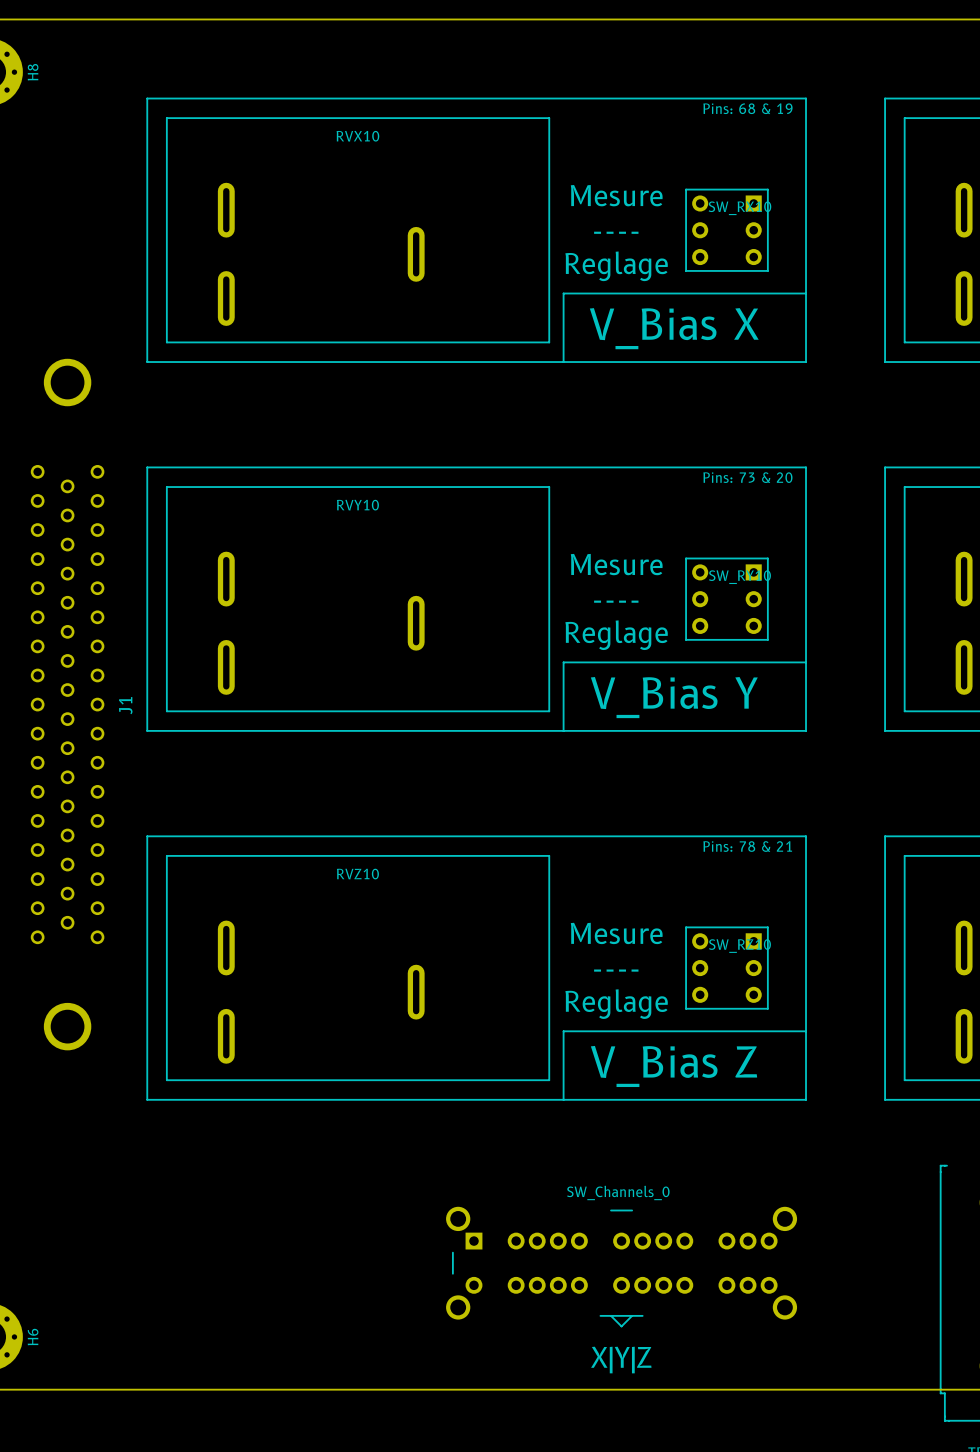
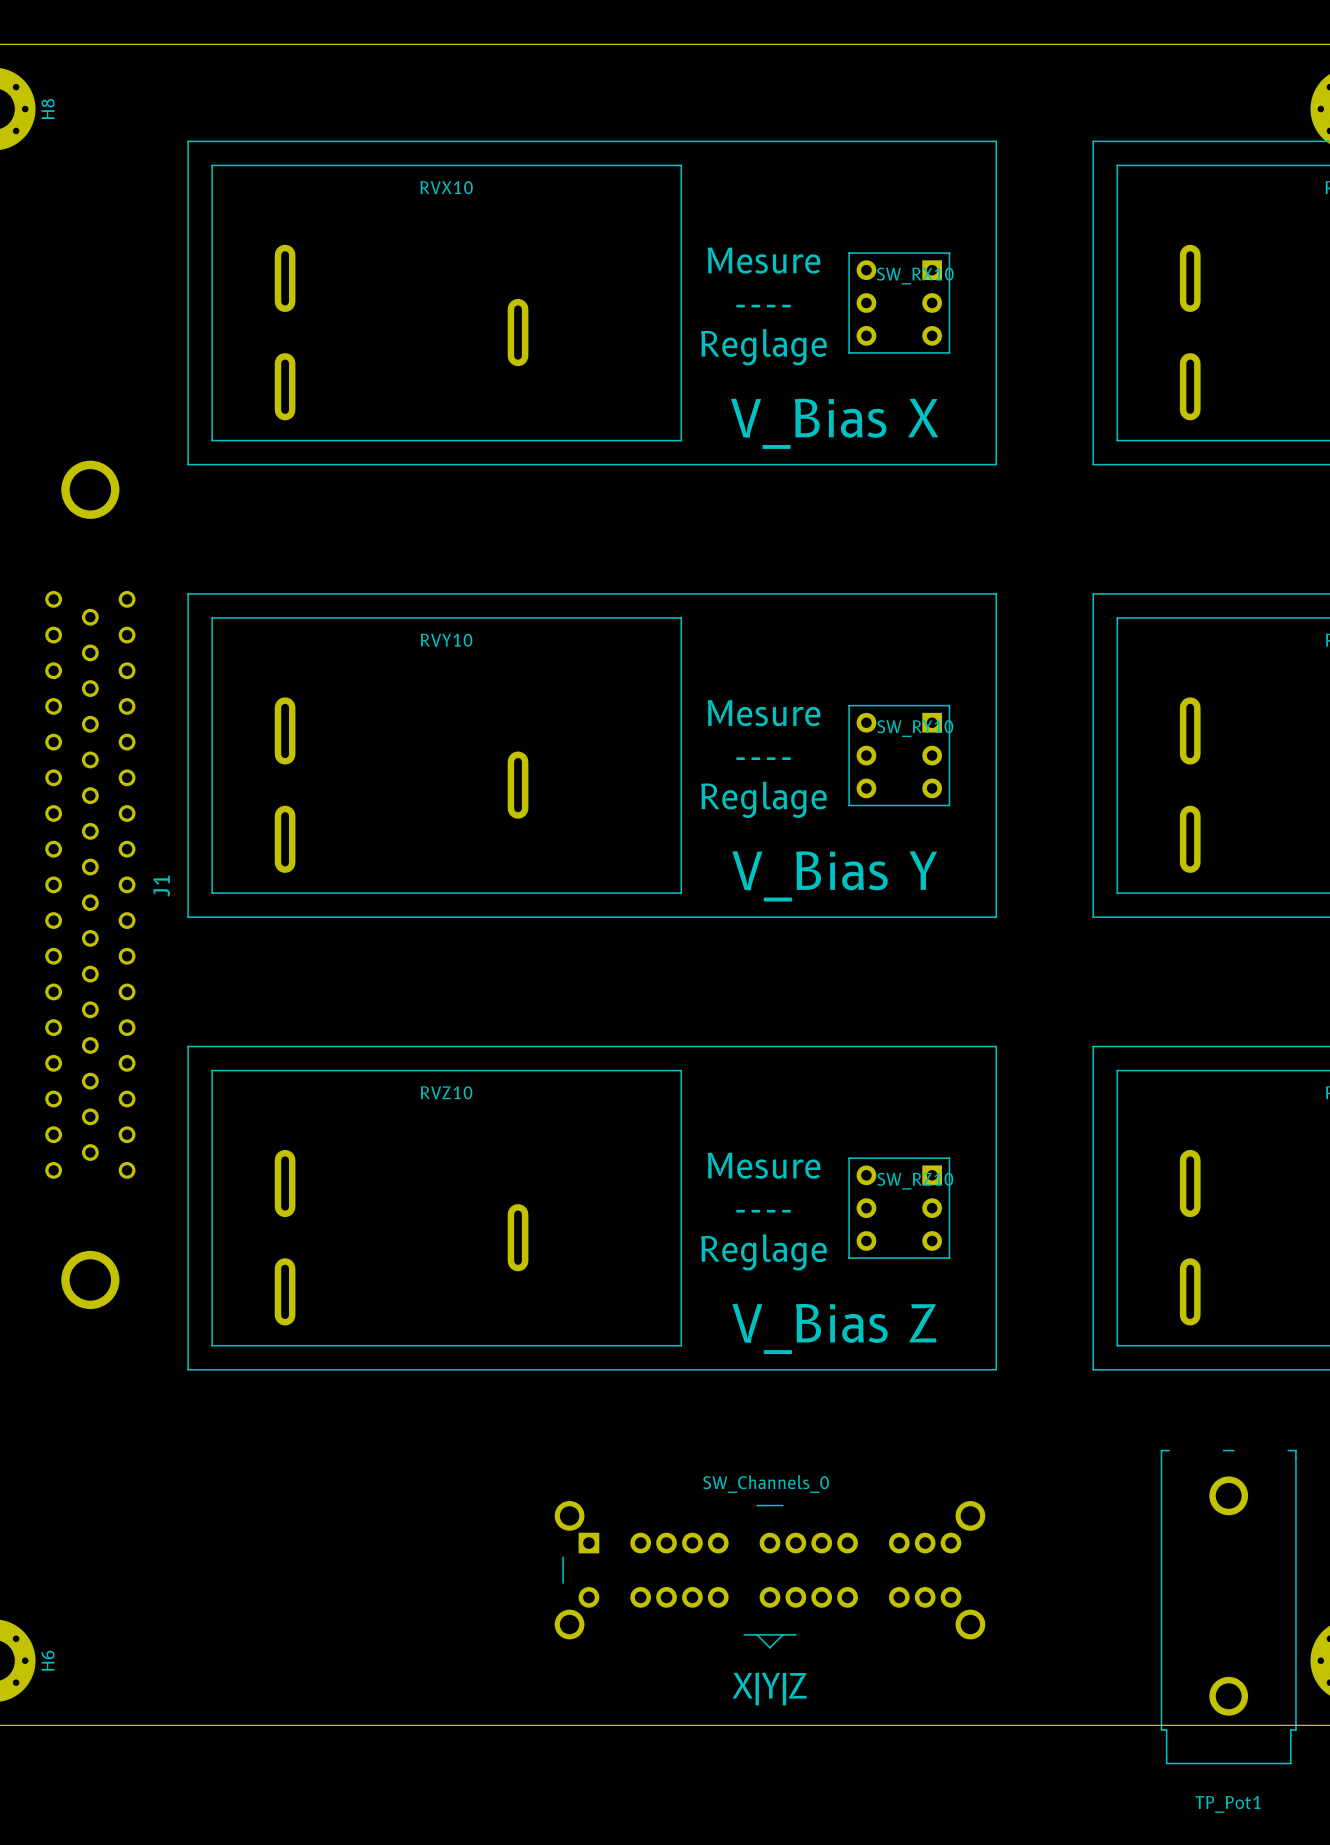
text: Pins: 68 & 19 (747, 108) -> none
line: (806, 293) (563, 293) (563, 362) -> none
text: Pins: 73 & 20 (747, 477) -> none
line: (806, 662) (563, 662) (563, 730) -> none
text: Pins: 78 & 21 (747, 846) -> none
line: (806, 1031) (563, 1031) (563, 1099) -> none

